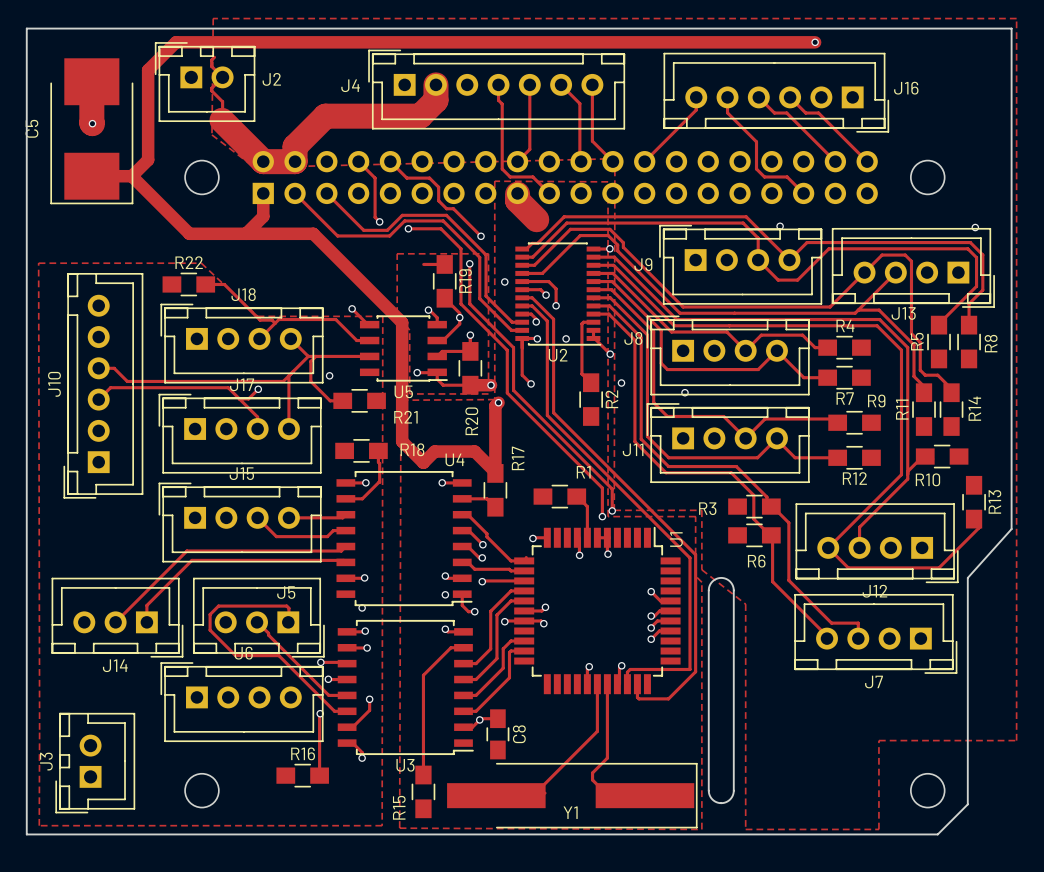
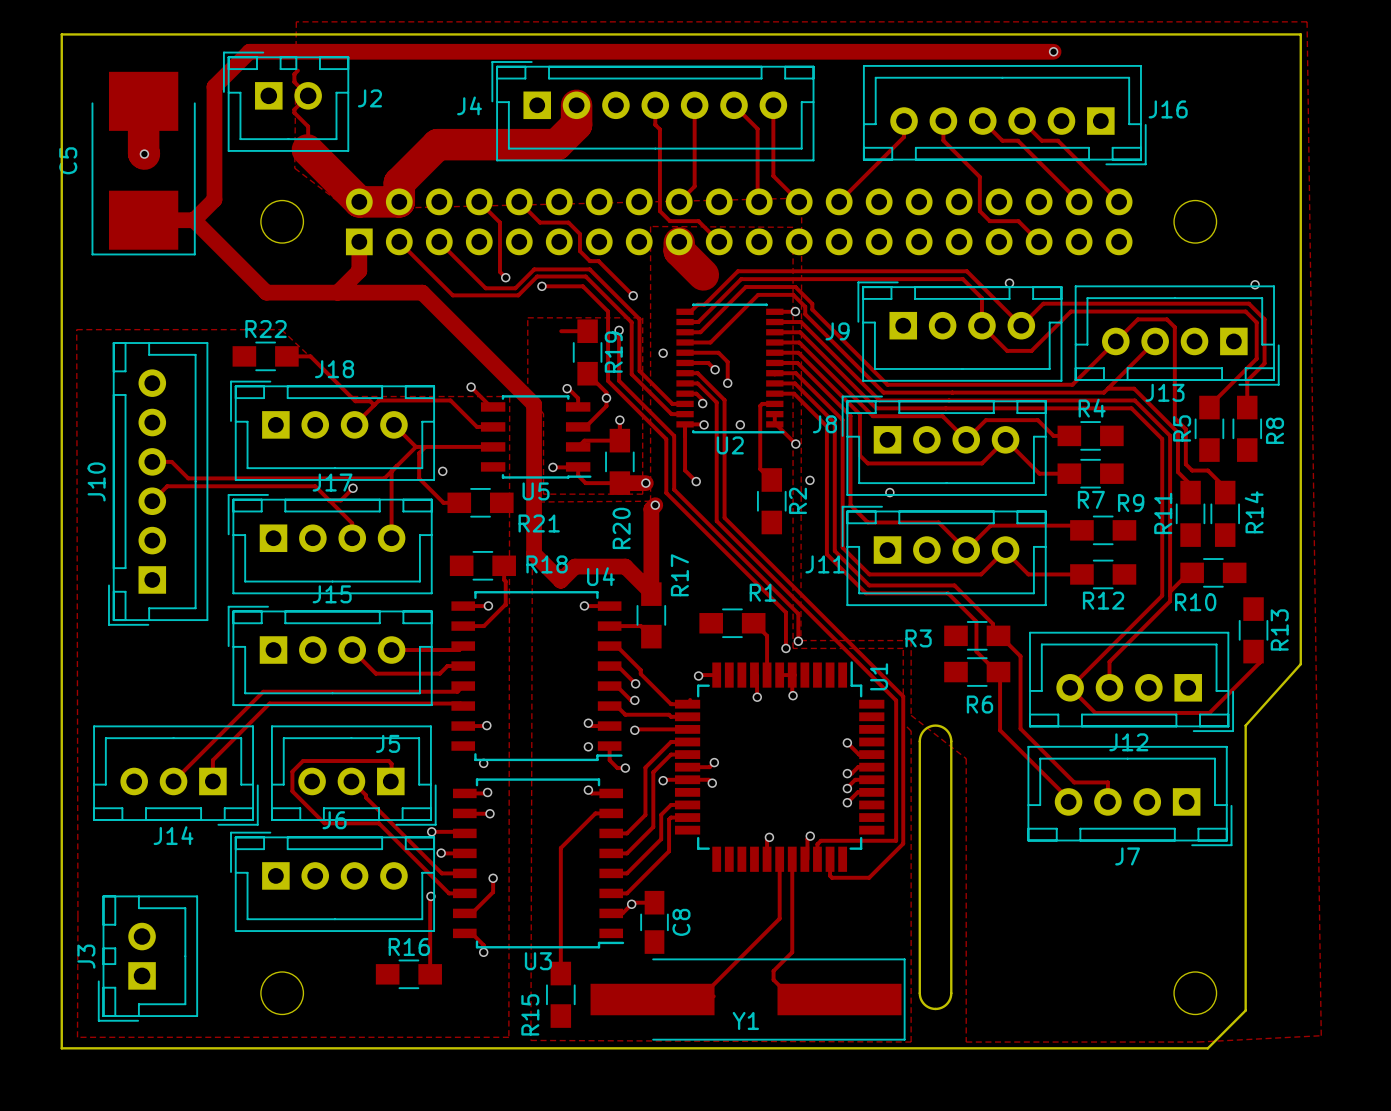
zone outline: (1016, 18) (1016, 740) (878, 740) (878, 829) -> (1307, 21) (1321, 1035) (1198, 1042) (1133, 1042)

